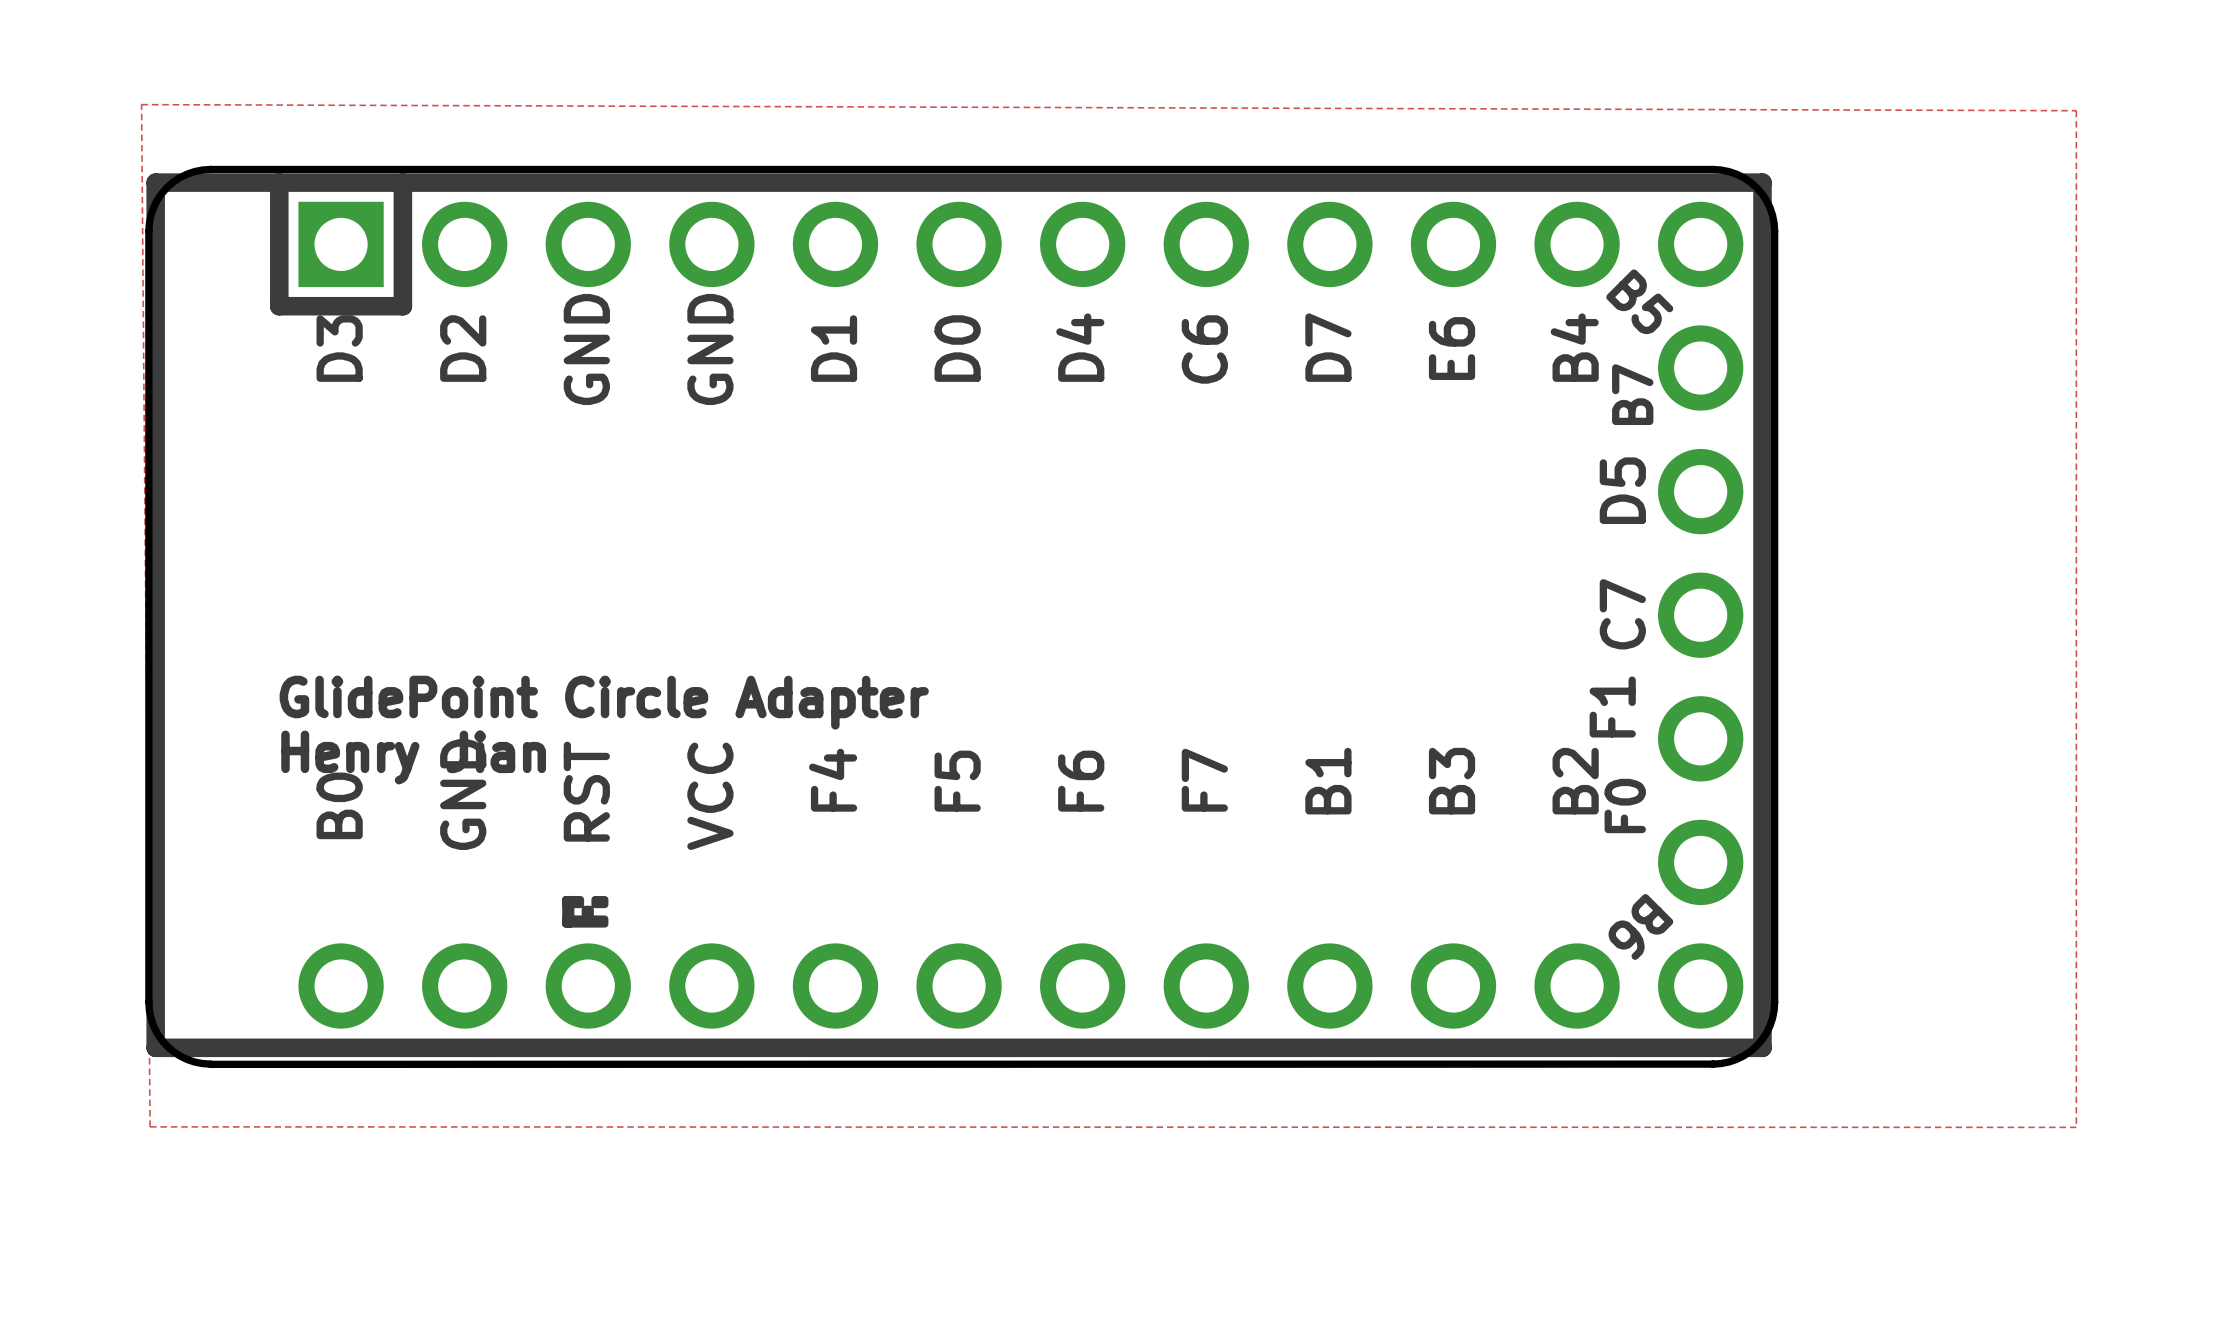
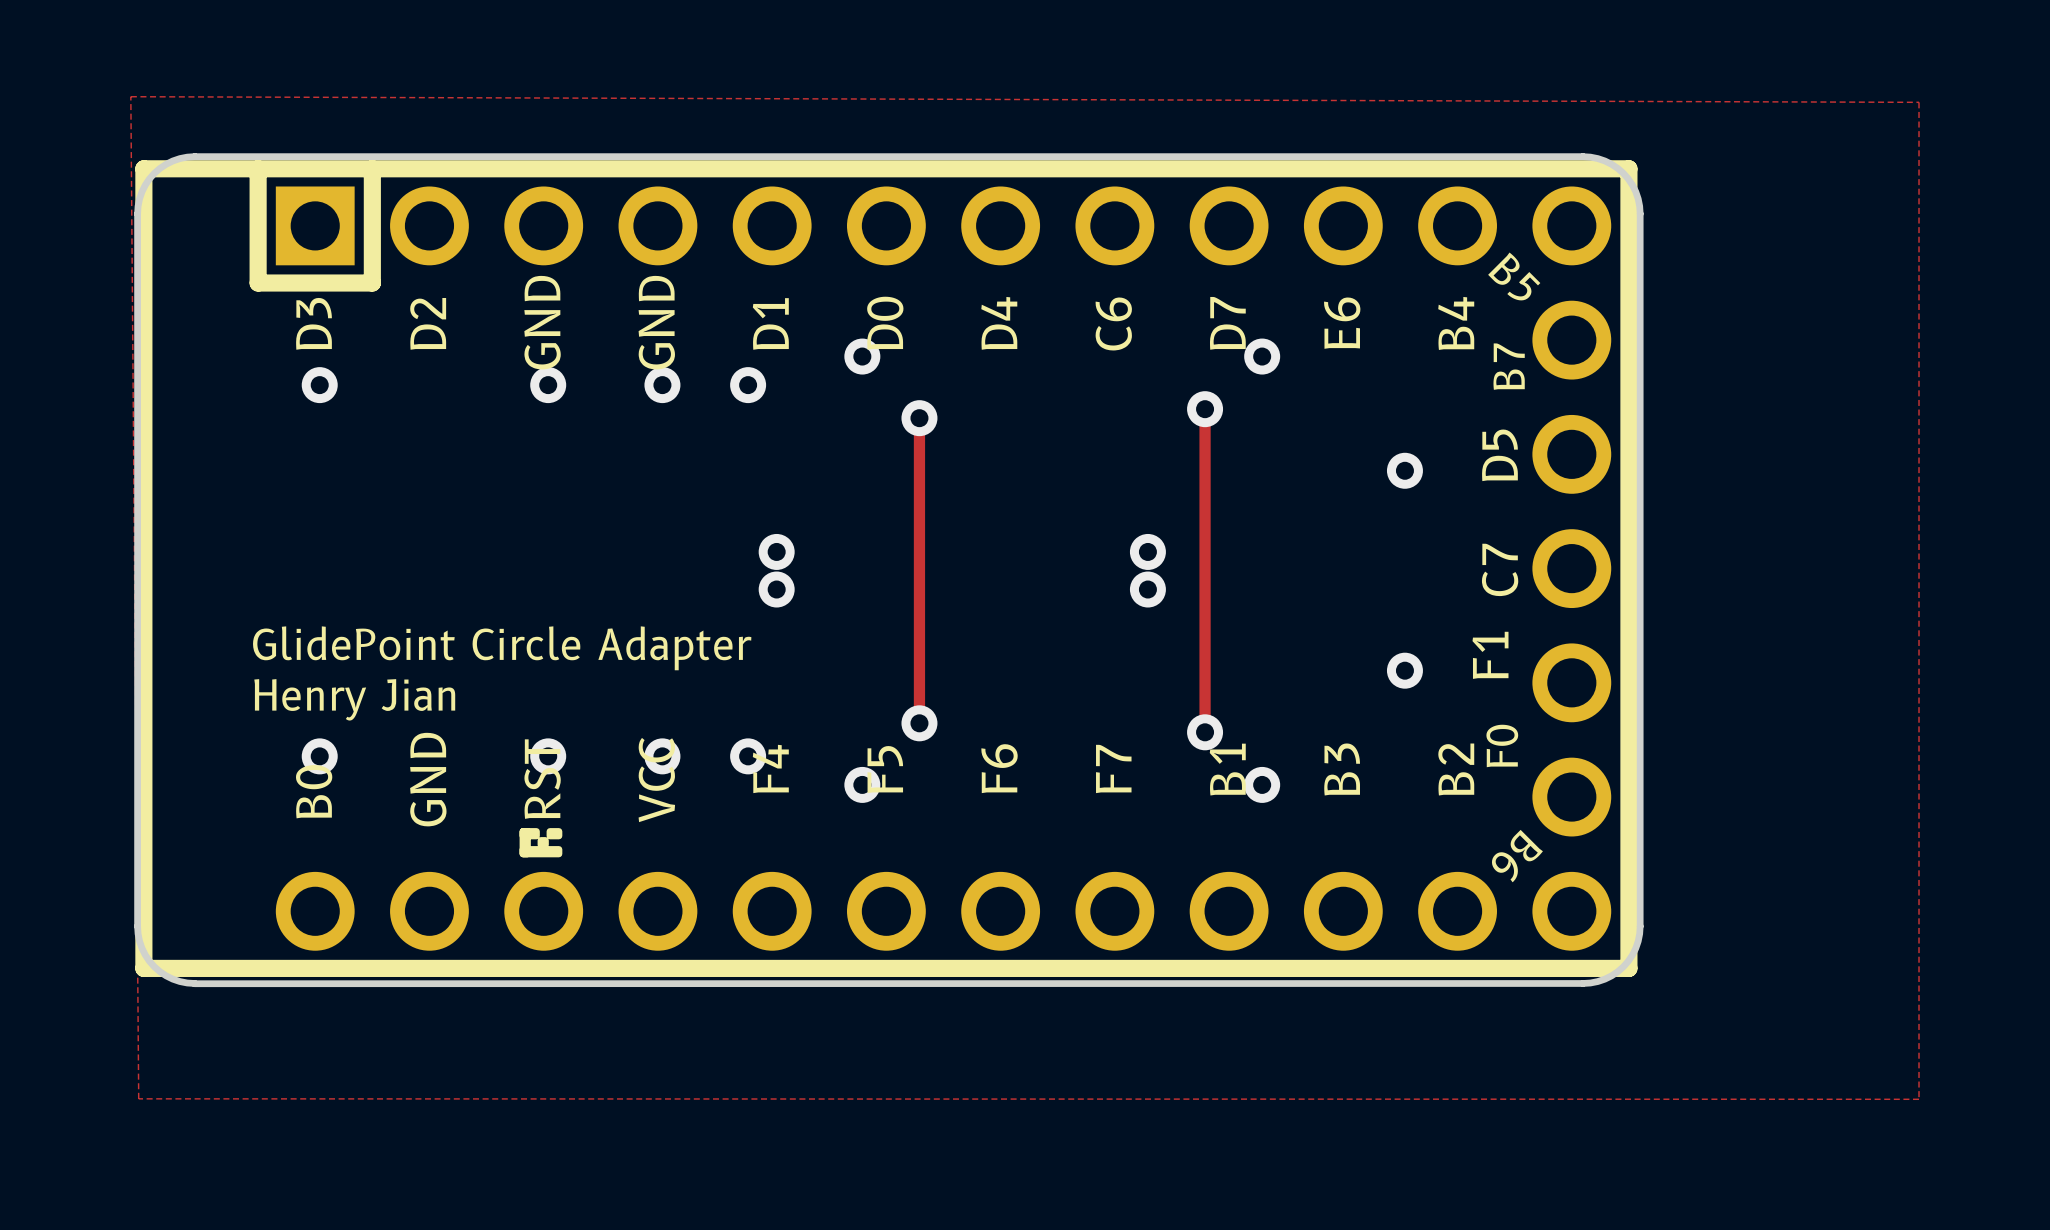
zone outline: (141, 104) (150, 1126) (2076, 1127) -> (130, 96) (138, 1098) (1919, 1099) (1919, 1041)
part footprint: [146, 173, 1772, 1058] -> [135, 160, 1638, 977]
via: none -> (862, 356)
via: none -> (1262, 356)
via: none -> (319, 385)
via: none -> (548, 385)
via: none -> (662, 385)
via: none -> (748, 385)
track: none -> (1205, 409) (1205, 732)
via: none -> (1205, 409)
track: none -> (919, 418) (919, 723)
via: none -> (919, 418)
via: none -> (1404, 470)
via: none -> (776, 551)
via: none -> (1147, 551)
via: none -> (776, 589)
via: none -> (1147, 589)
via: none -> (1404, 670)
via: none -> (919, 723)
via: none -> (1205, 732)
via: none -> (319, 756)
via: none -> (548, 756)
via: none -> (662, 756)
via: none -> (748, 756)
via: none -> (862, 784)
via: none -> (1262, 784)

